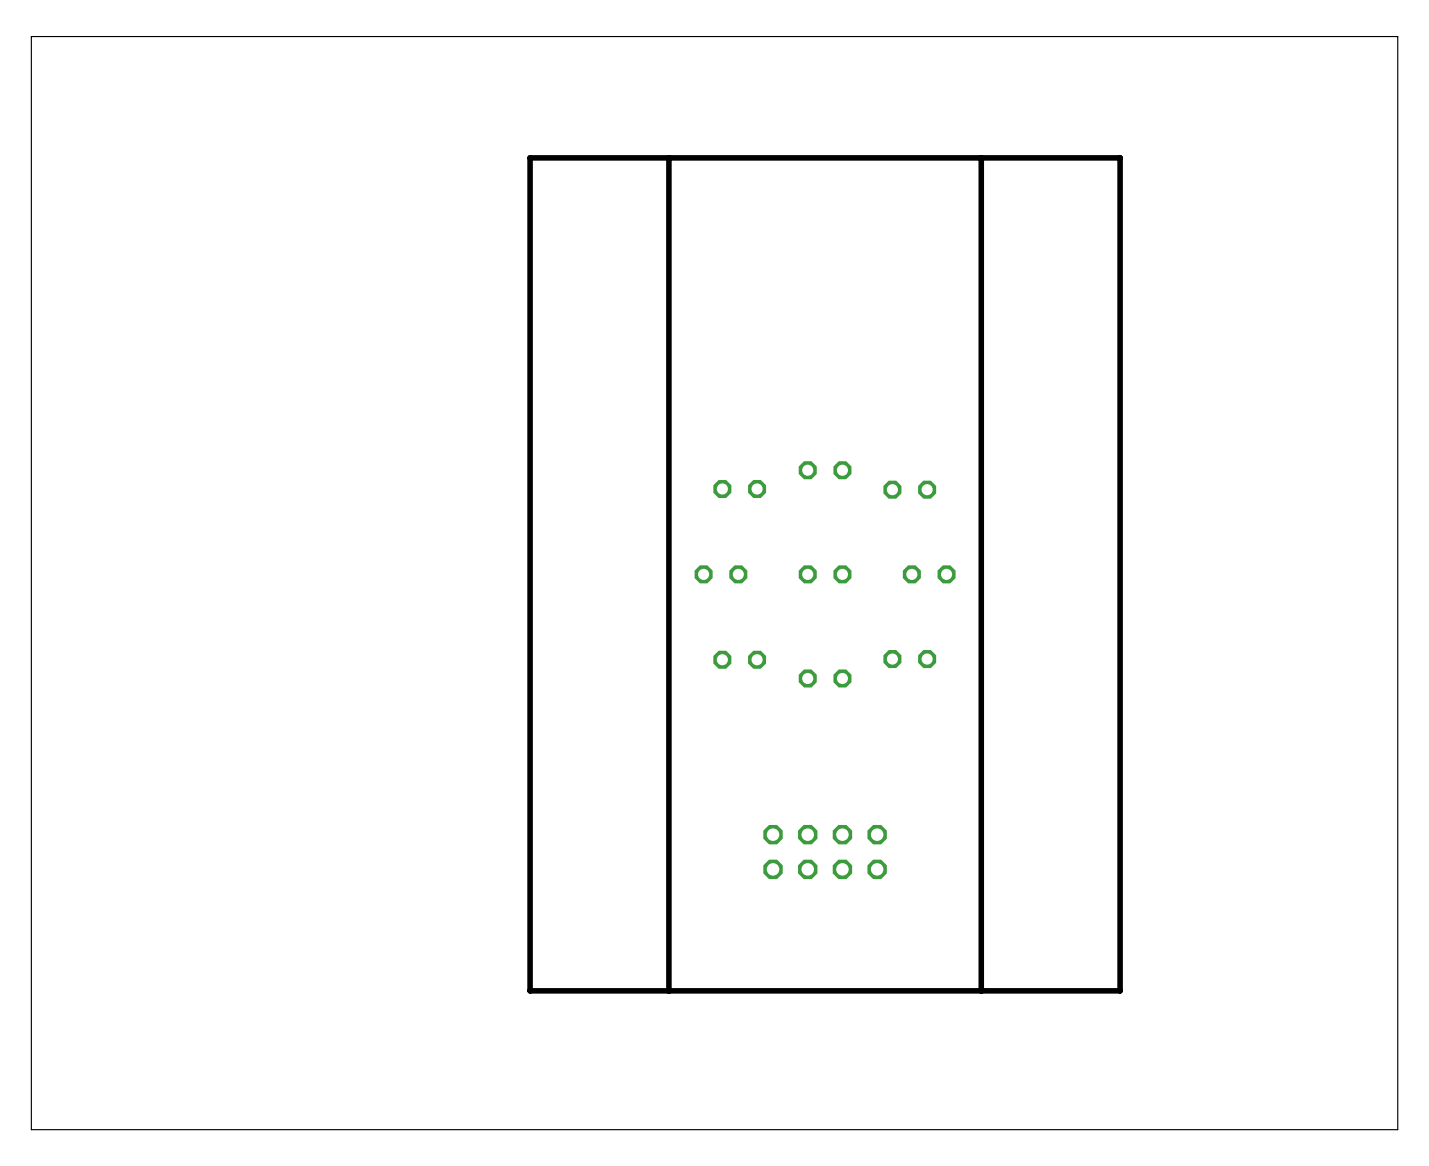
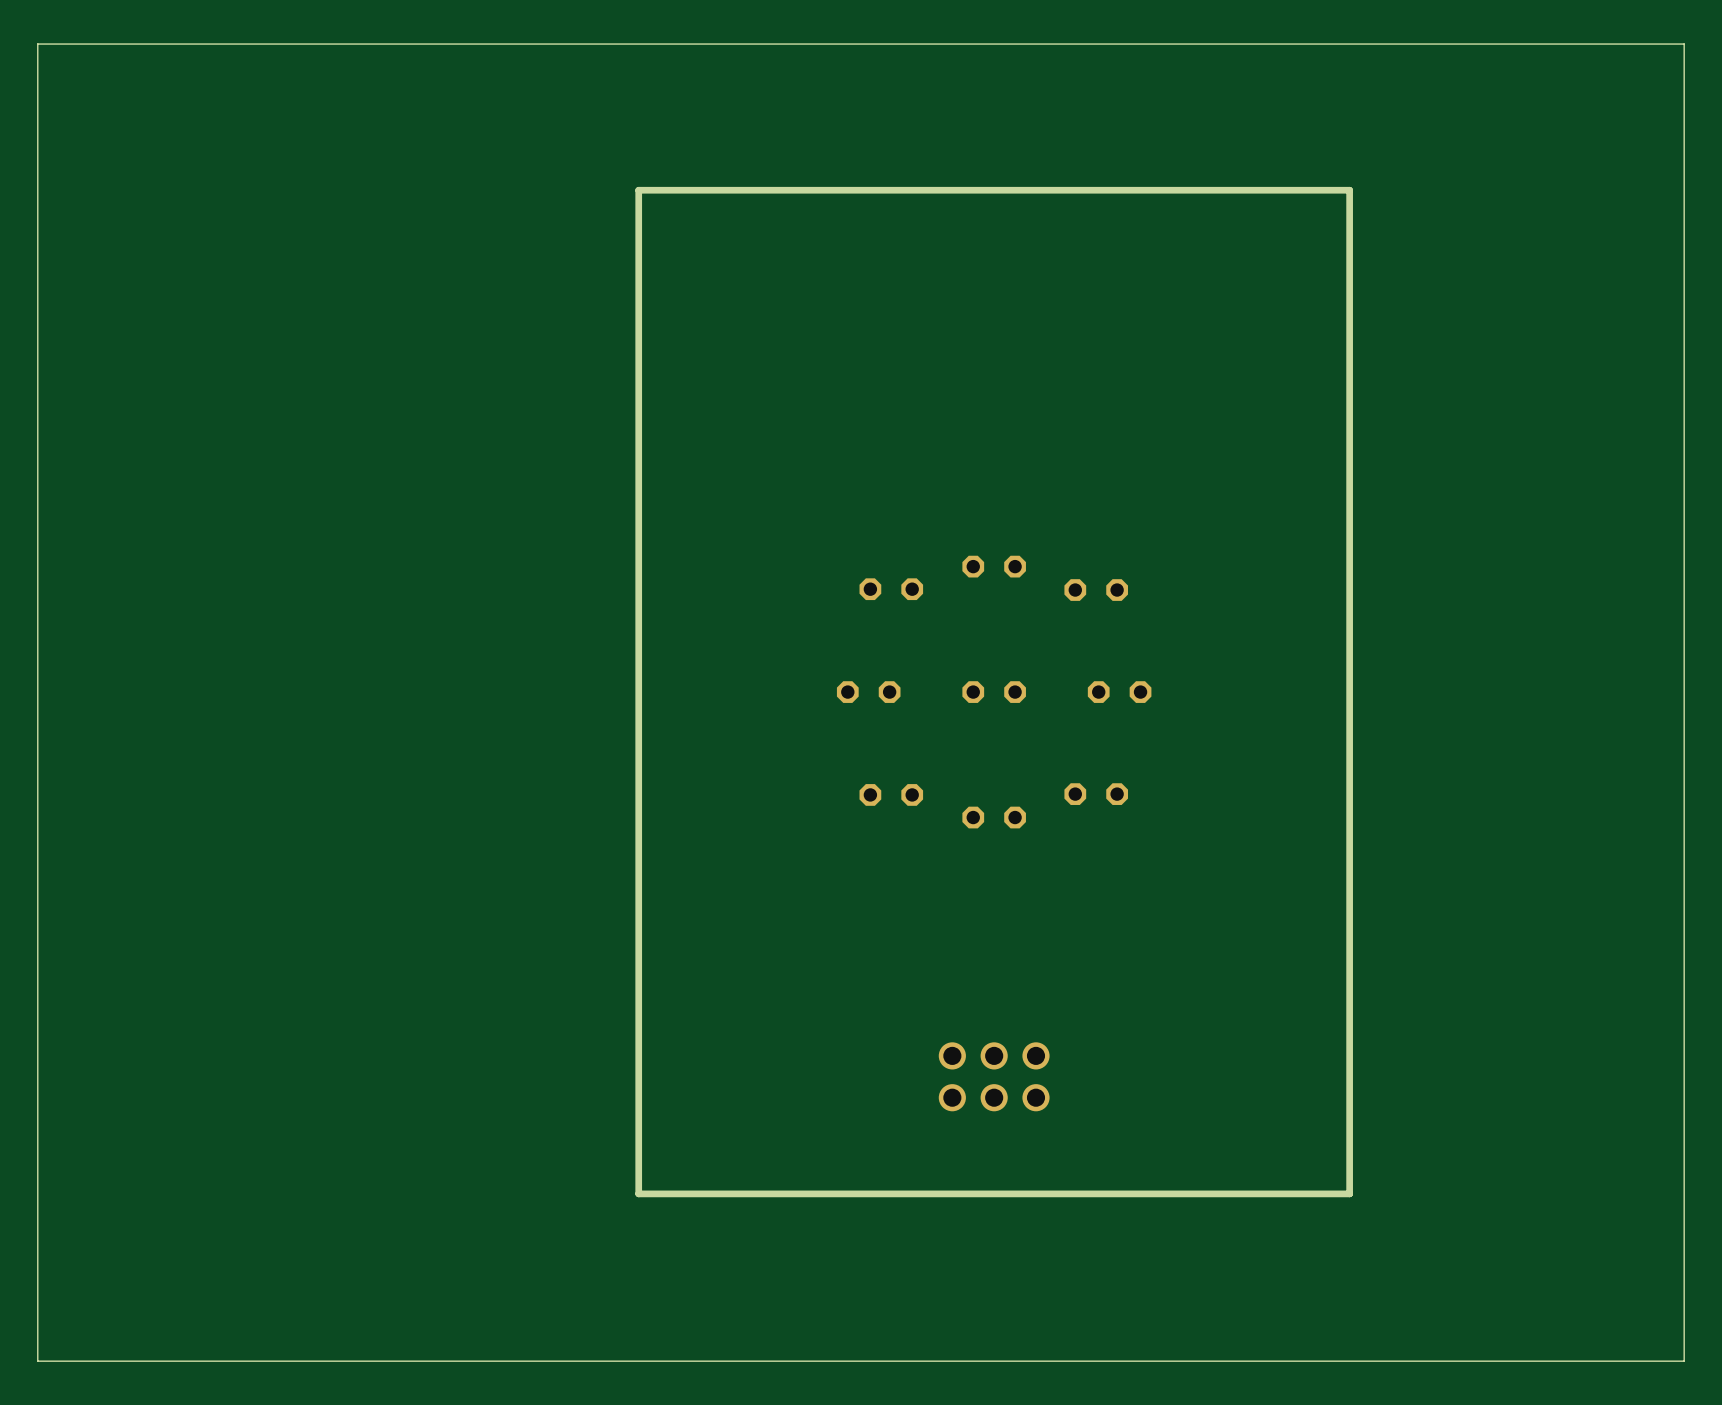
board edge: (668, 157) (668, 990) -> none
board edge: (981, 157) (981, 990) -> none
part: (825, 852) -> none
part: none -> (994, 1076)

